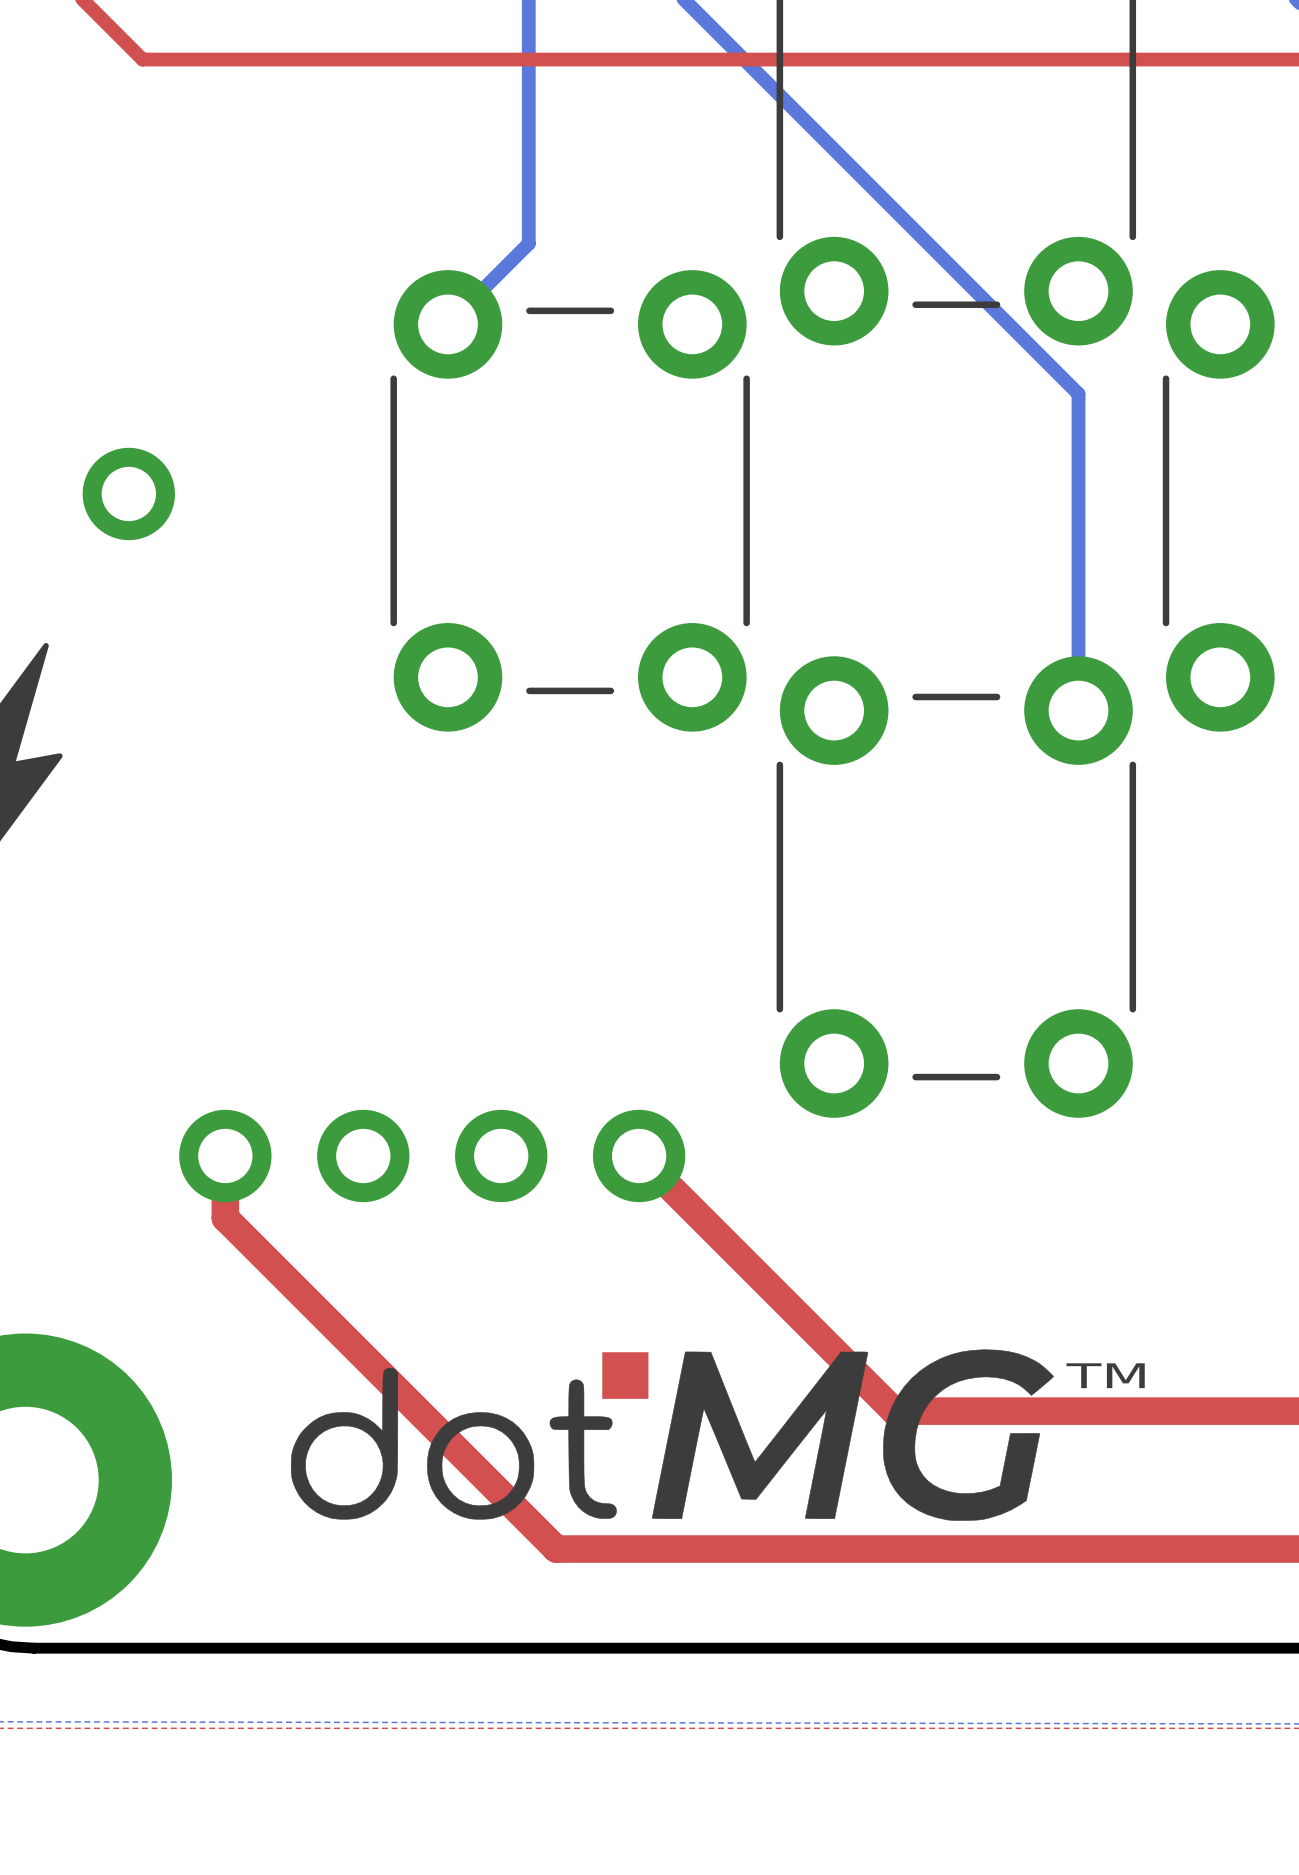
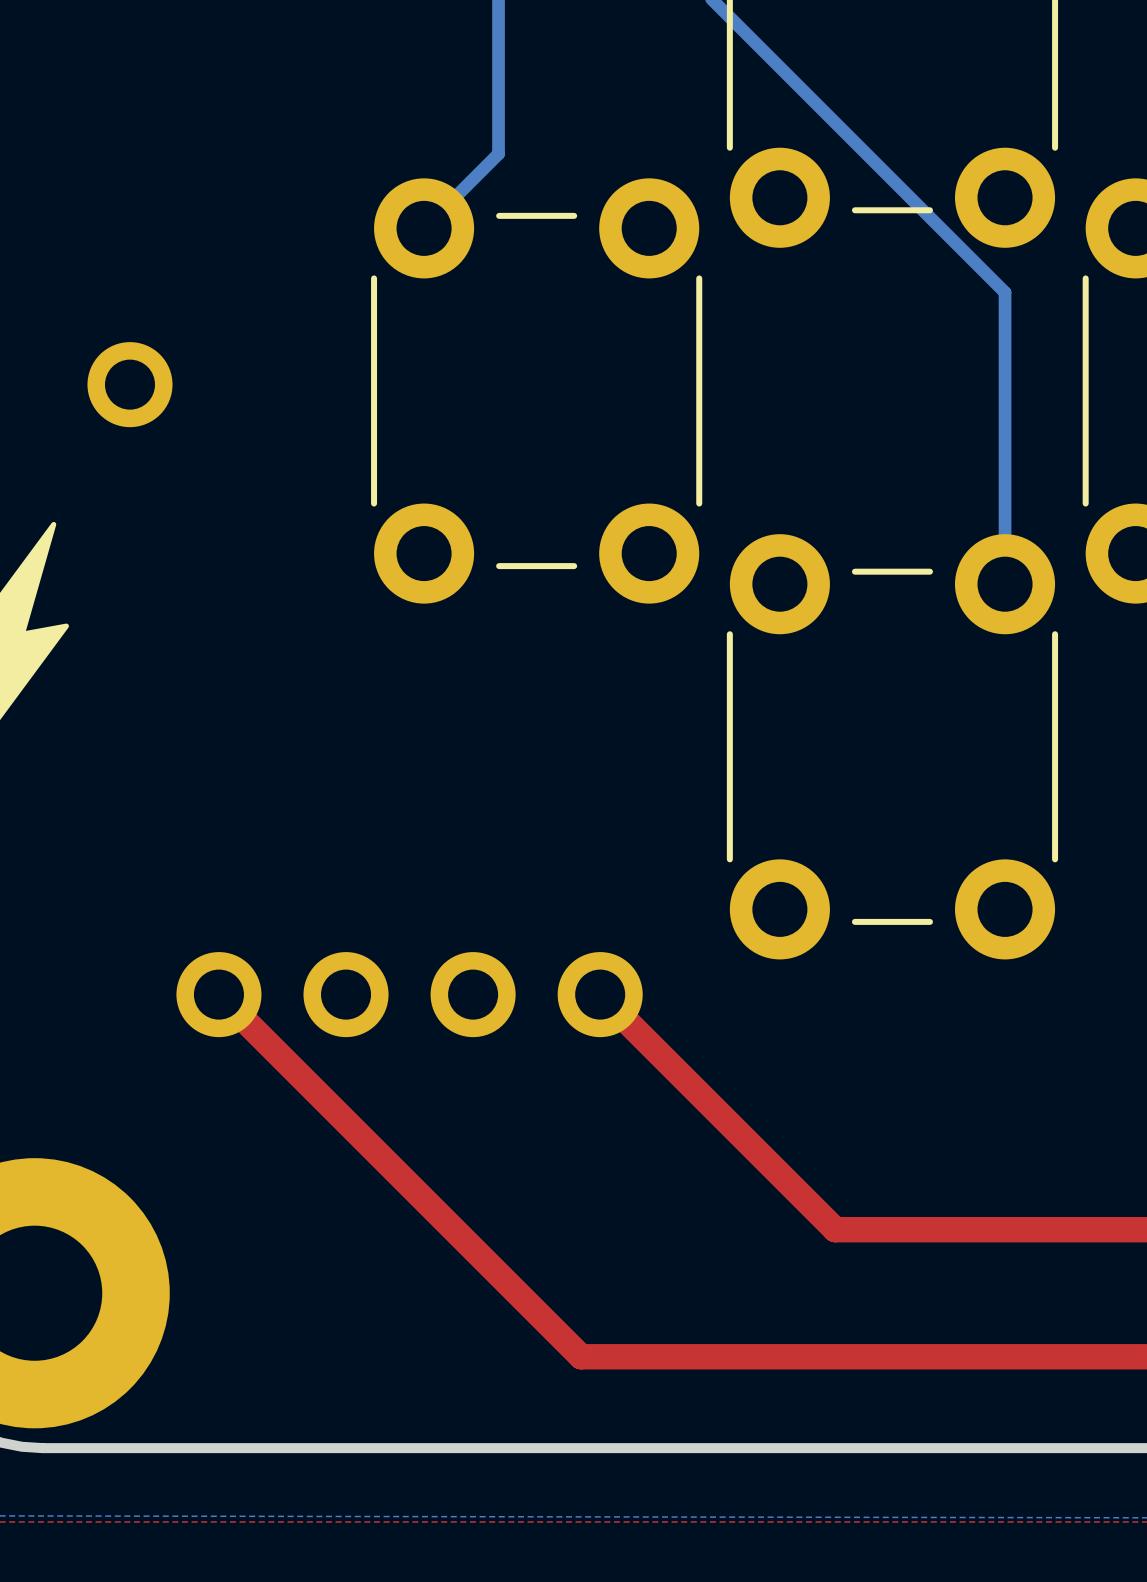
top track: (225, 1155) (225, 1218) (556, 1549) (618, 1549) -> (218, 994) (581, 1356)
part: (672, 1435) -> none

